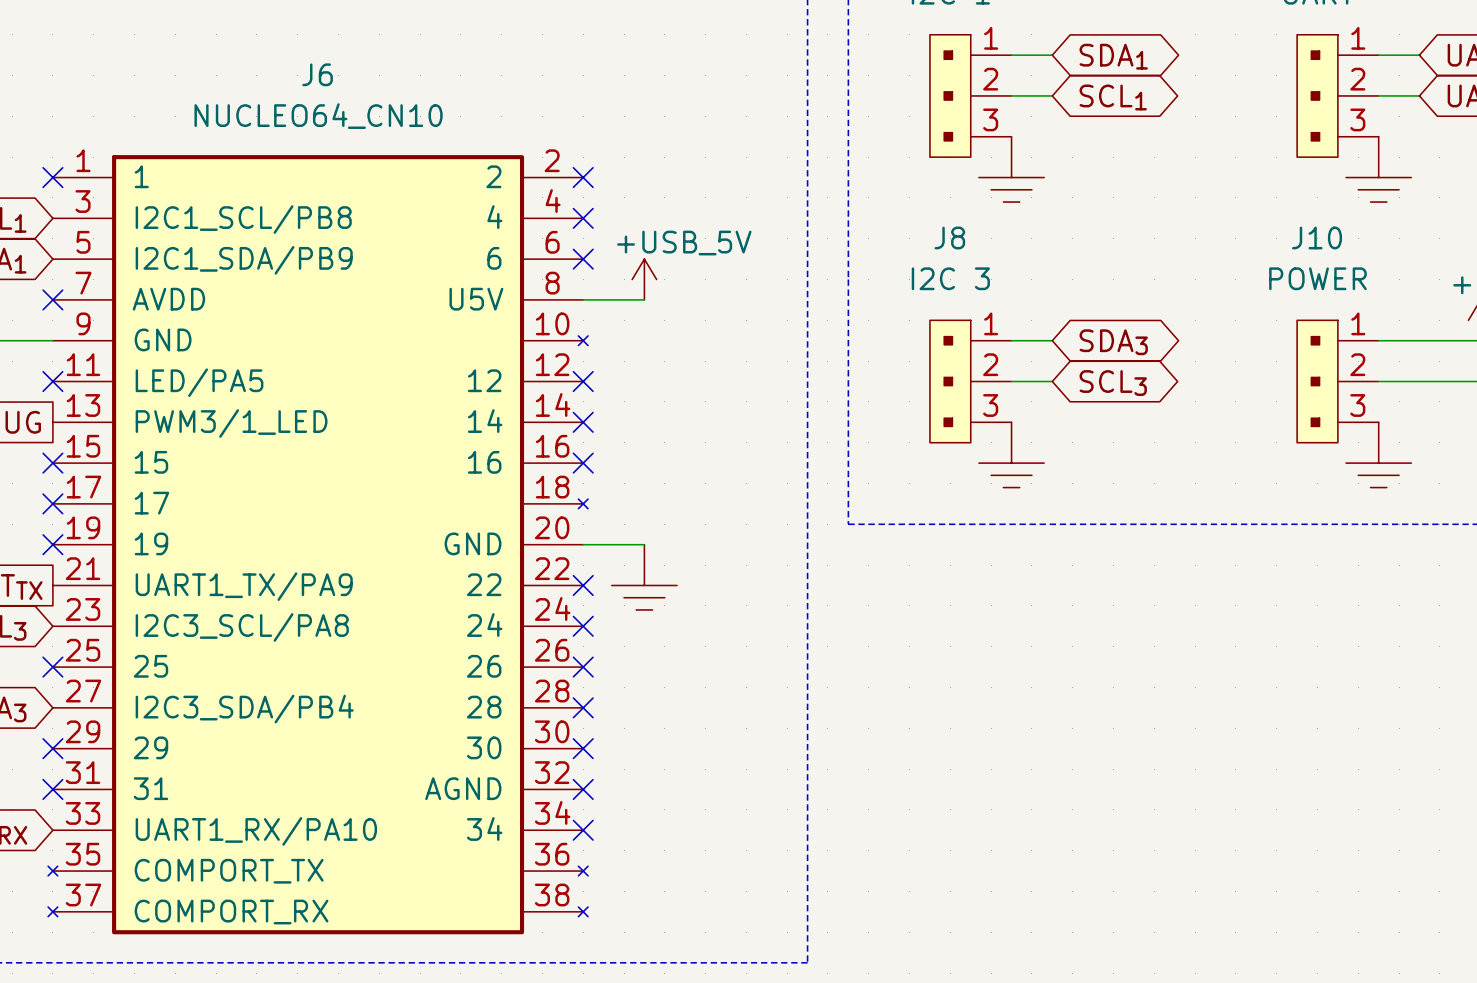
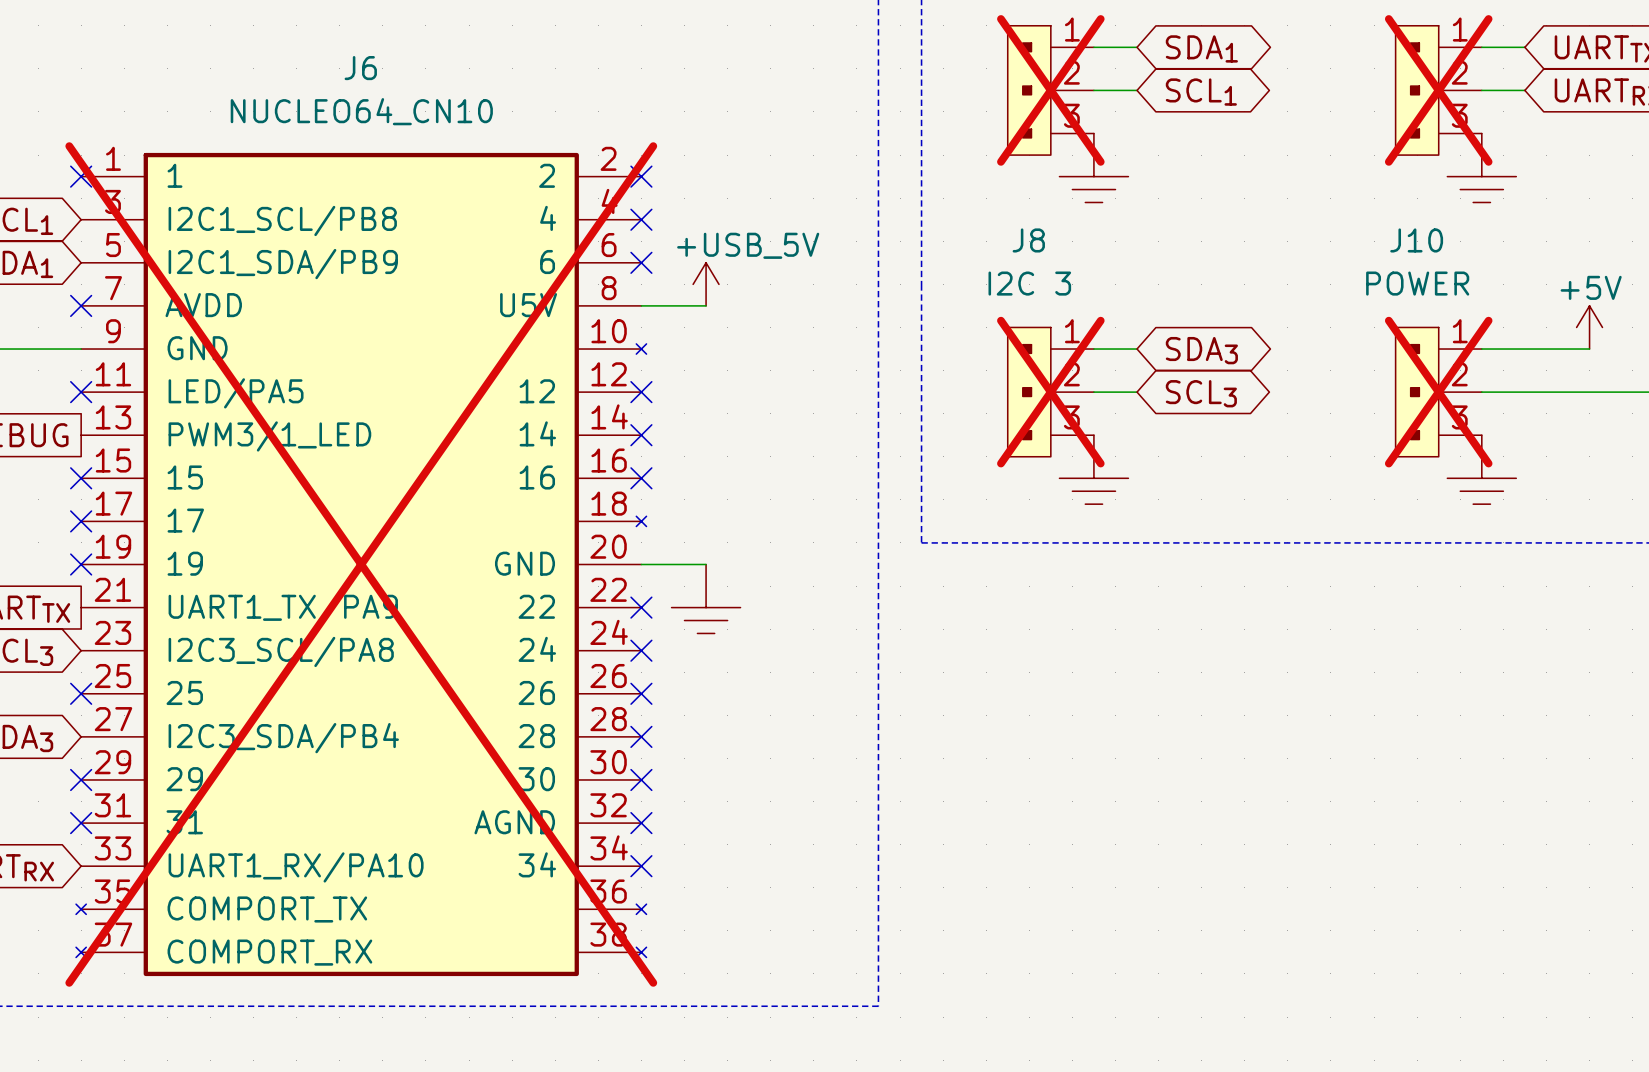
part do-not-place cross: none -> (1050, 90)
part do-not-place cross: none -> (1438, 90)
J8 do-not-place cross: none -> (1050, 392)
J10 do-not-place cross: none -> (1438, 392)
J6 do-not-place cross: none -> (361, 564)

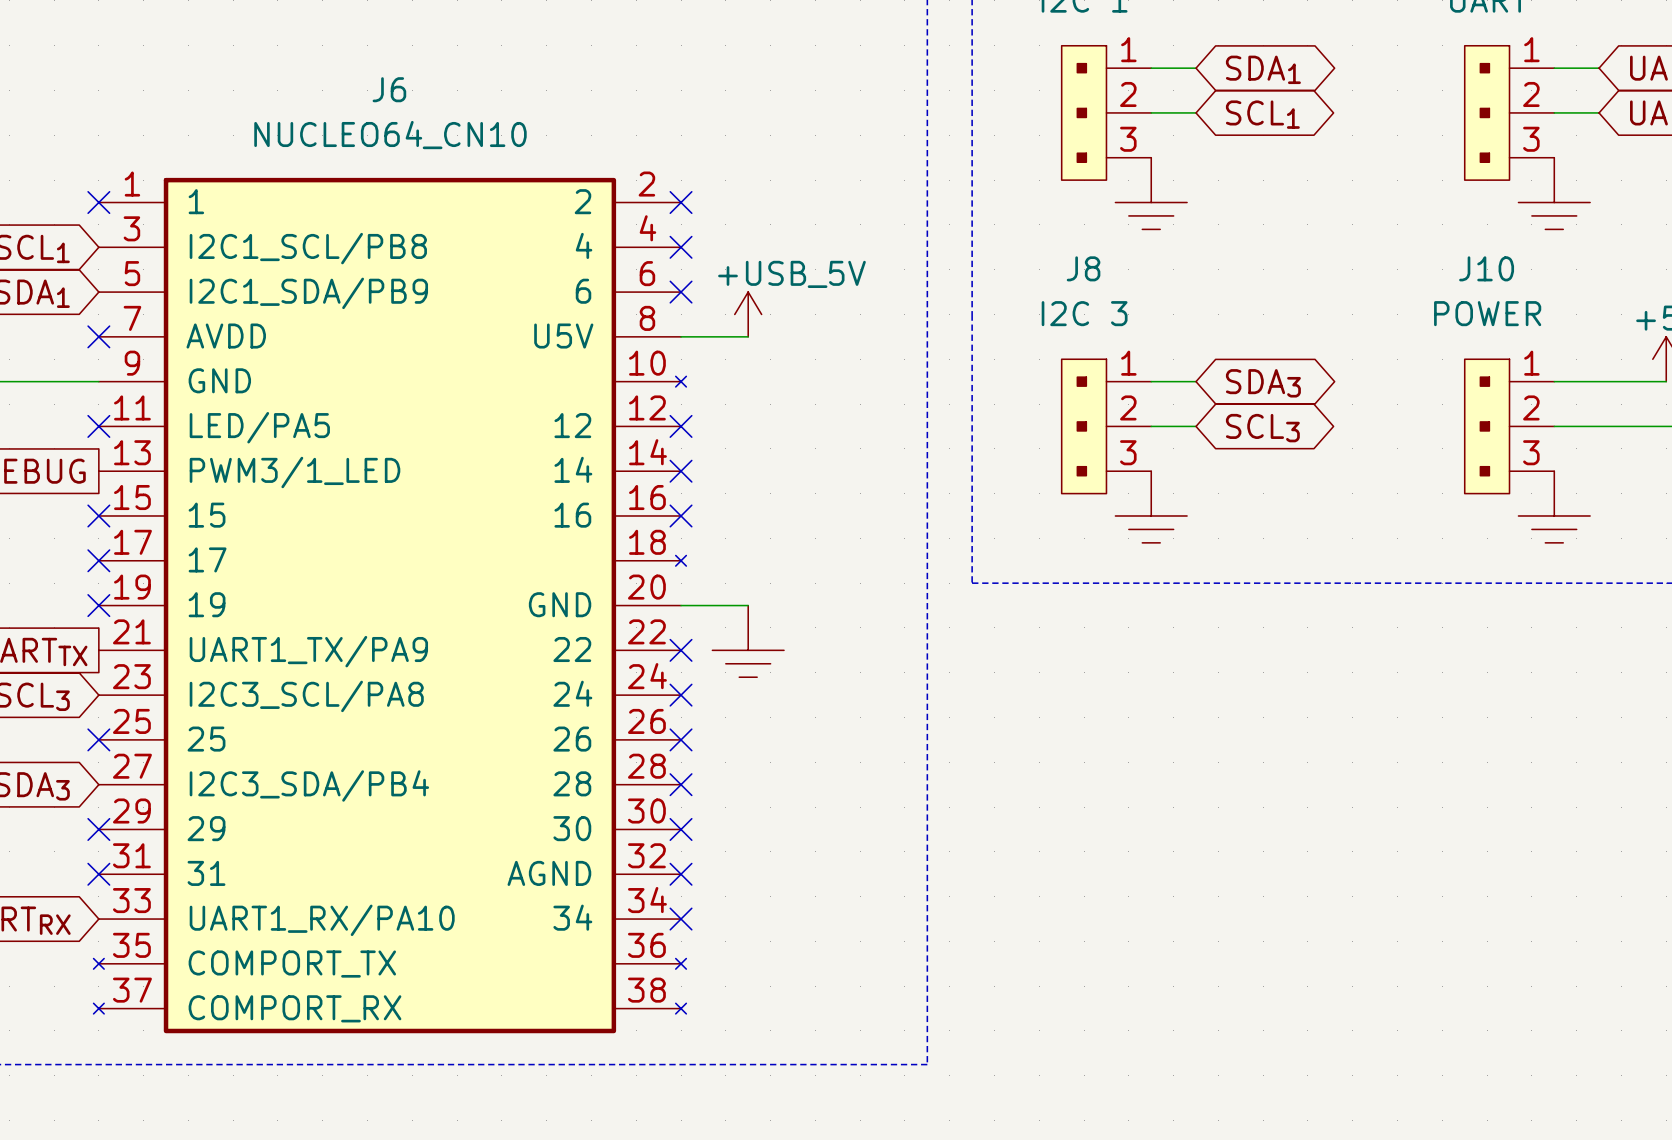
part do-not-place cross: (1050, 90) -> none
part do-not-place cross: (1438, 90) -> none
J8 do-not-place cross: (1050, 392) -> none
J10 do-not-place cross: (1438, 392) -> none
J6 do-not-place cross: (361, 564) -> none

